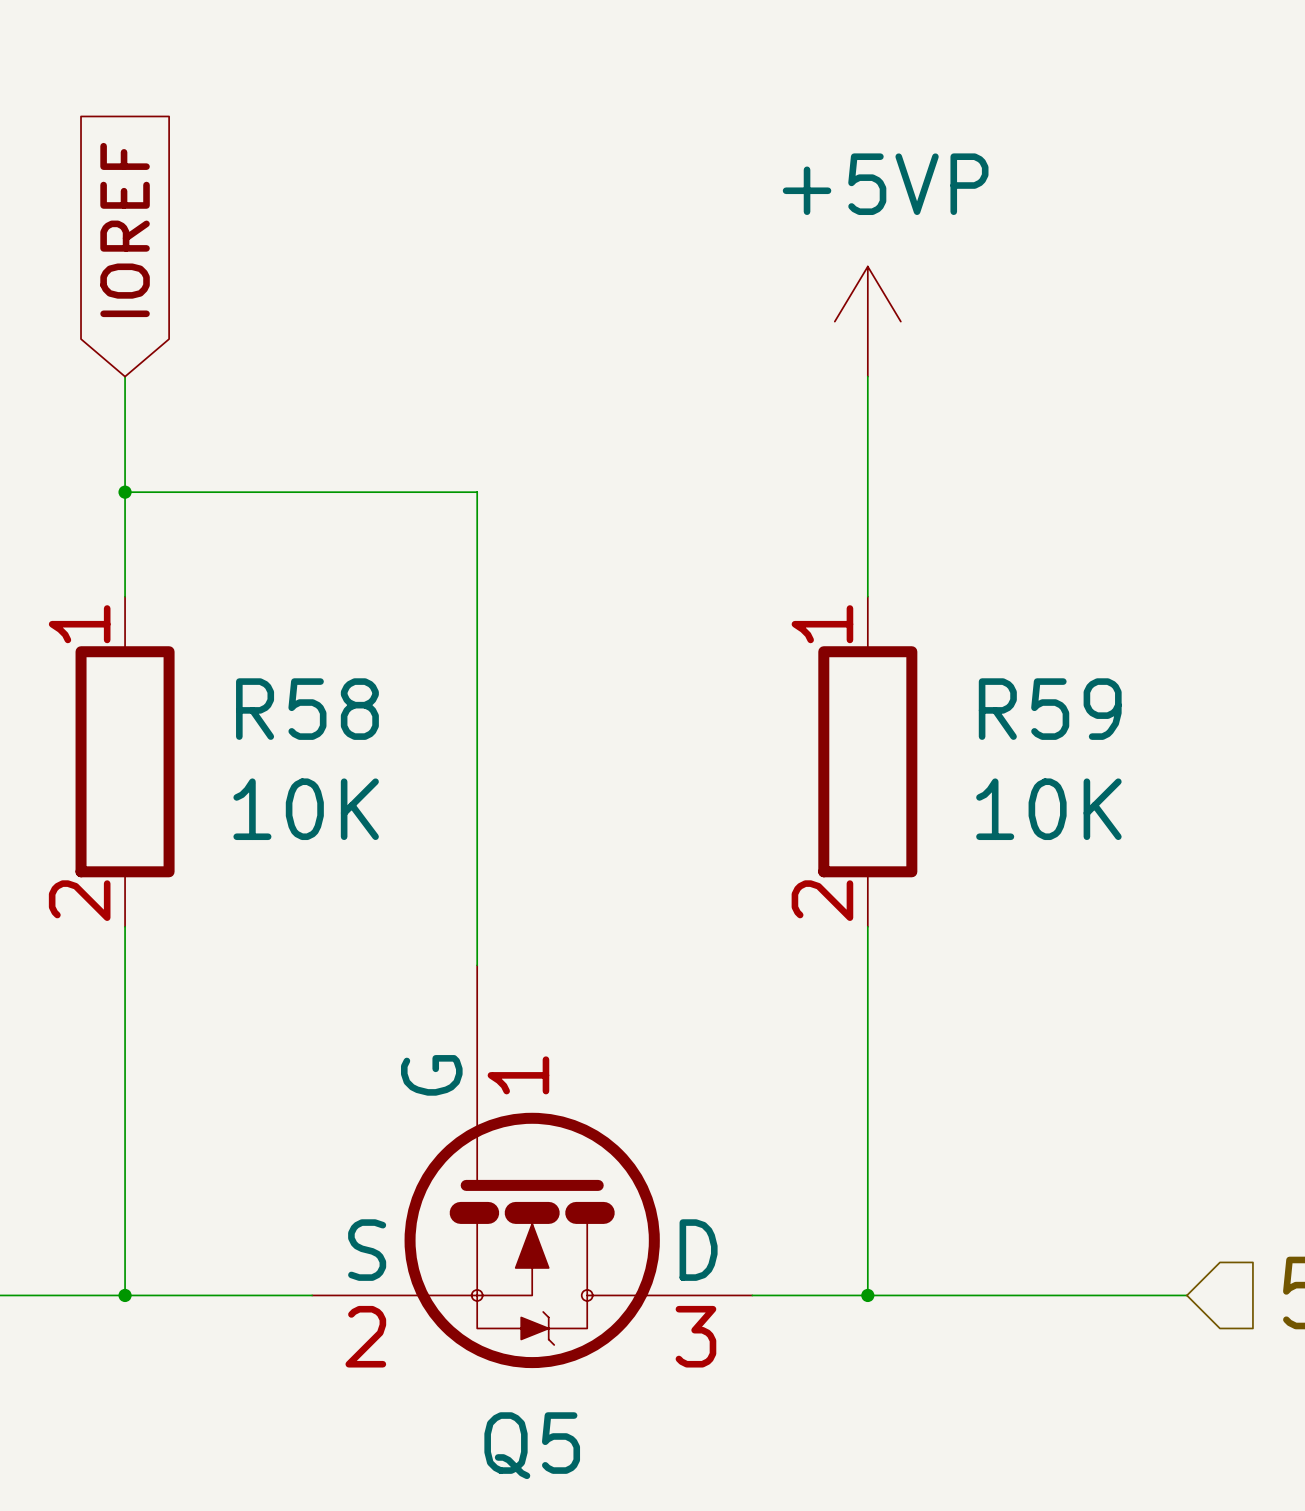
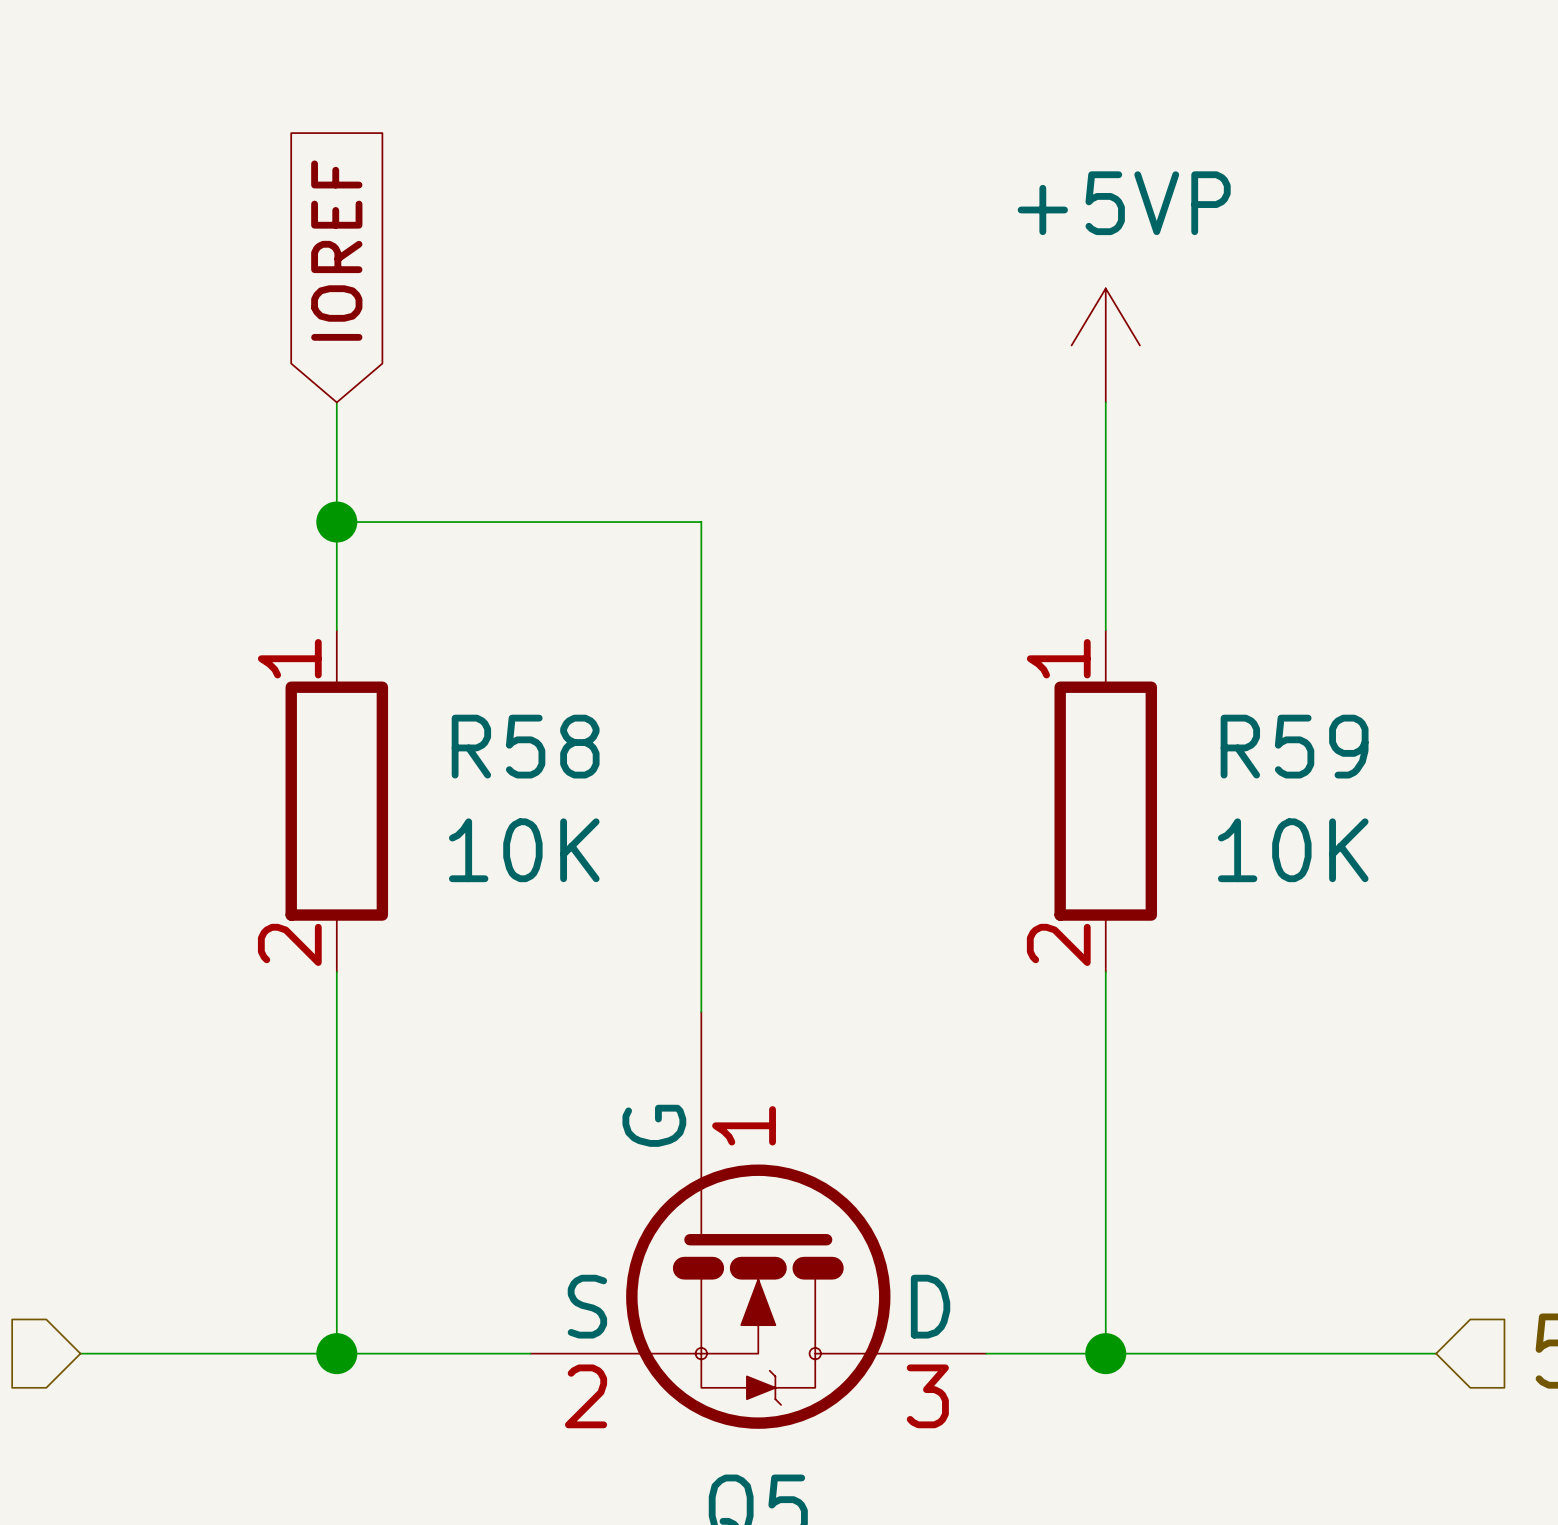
junction size: [118, 485, 132, 499] -> [316, 501, 358, 543]
junction size: [118, 1288, 132, 1303] -> [316, 1333, 358, 1375]
junction size: [861, 1288, 875, 1303] -> [1085, 1333, 1127, 1375]

